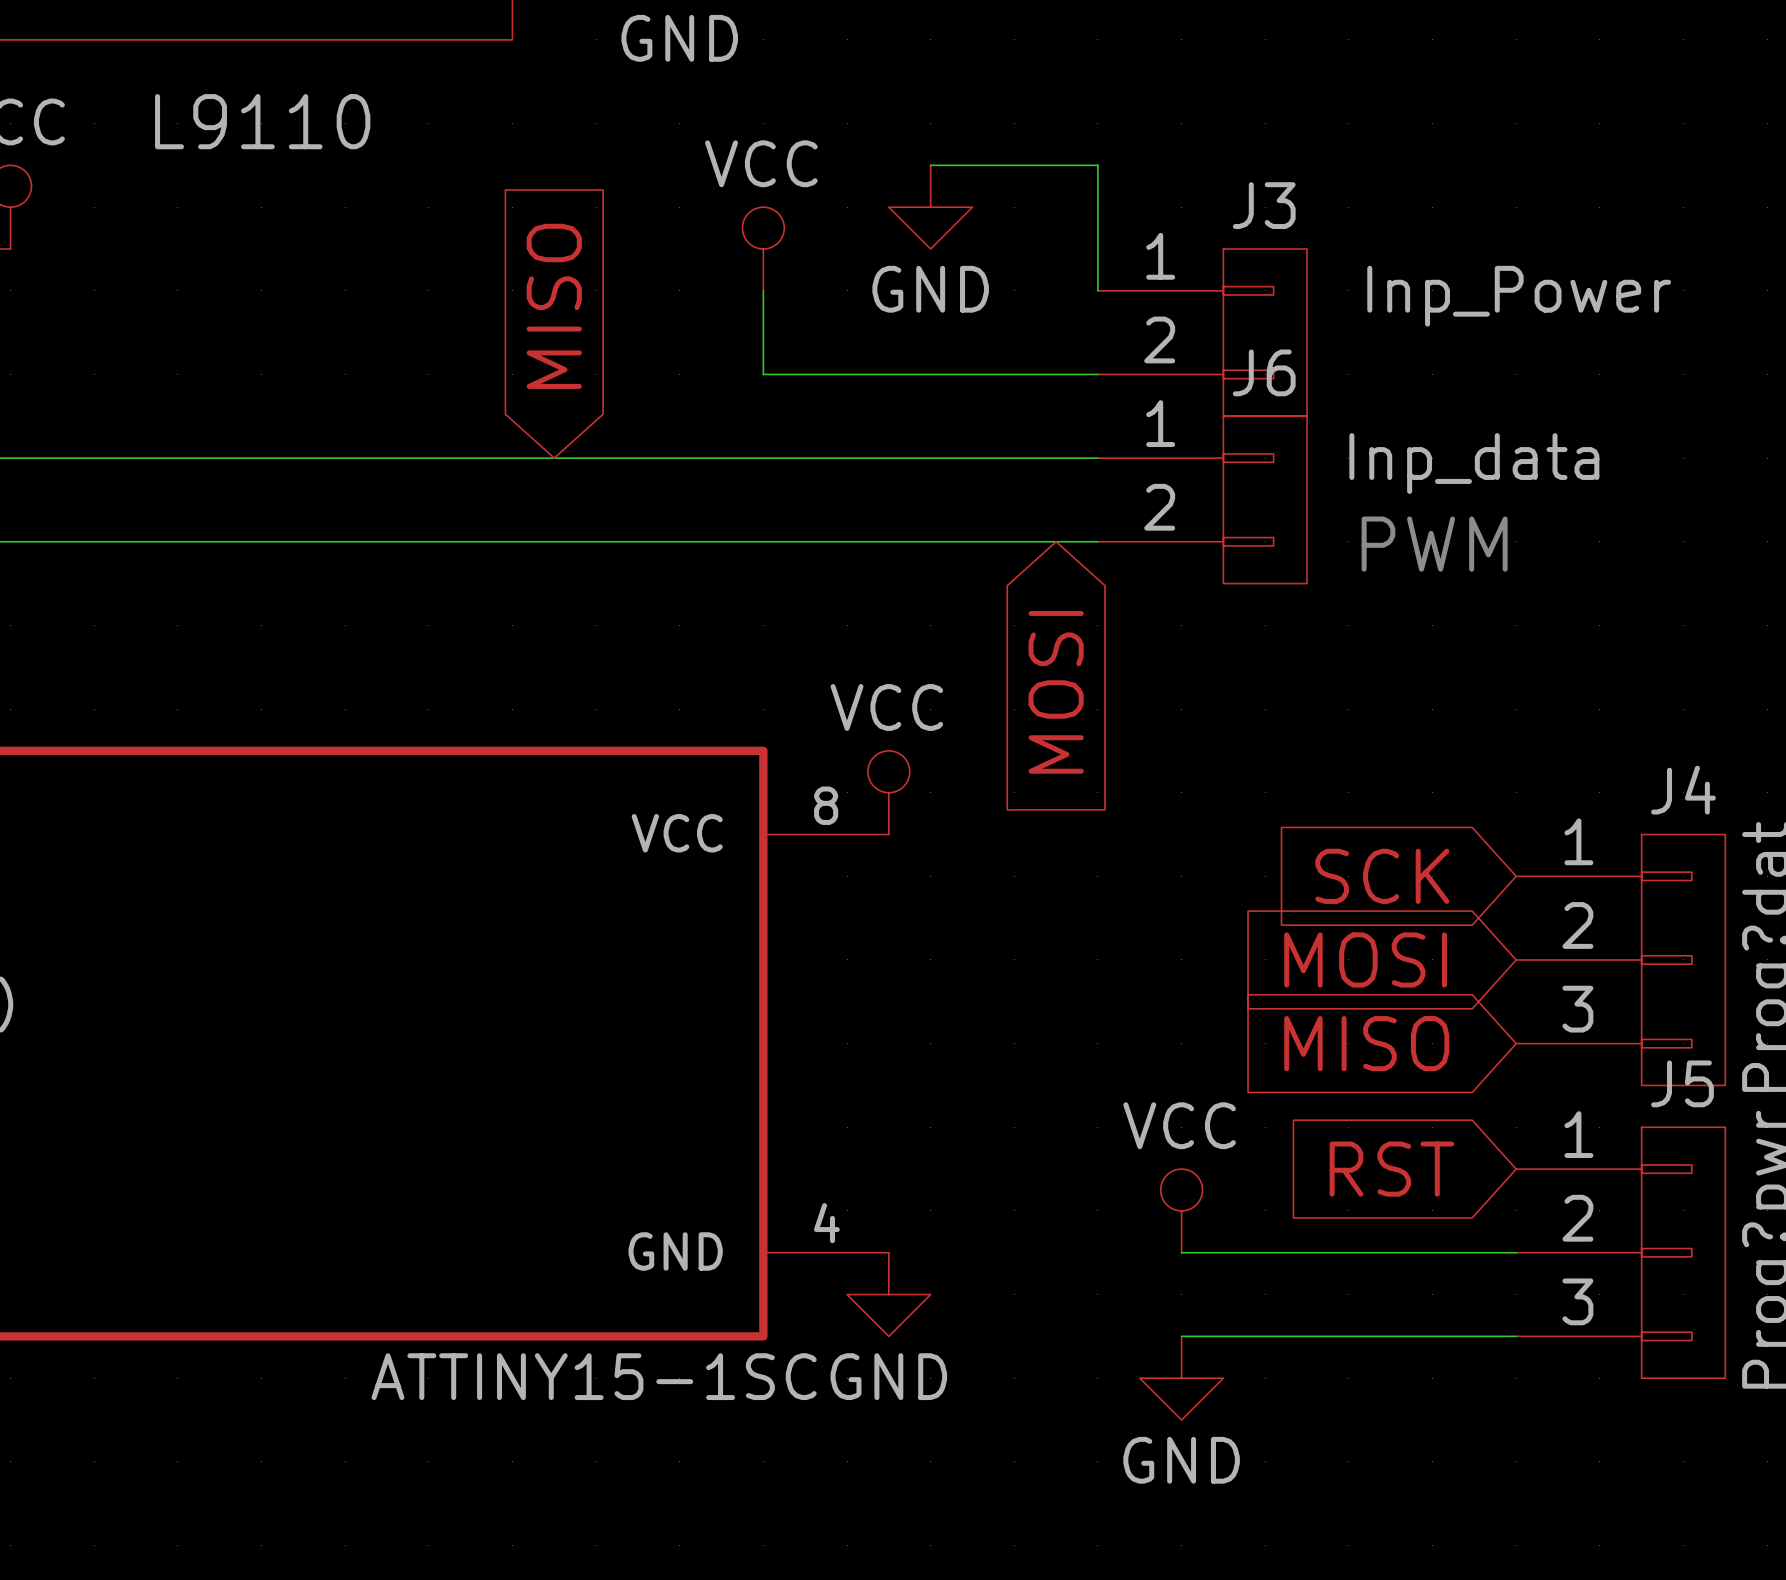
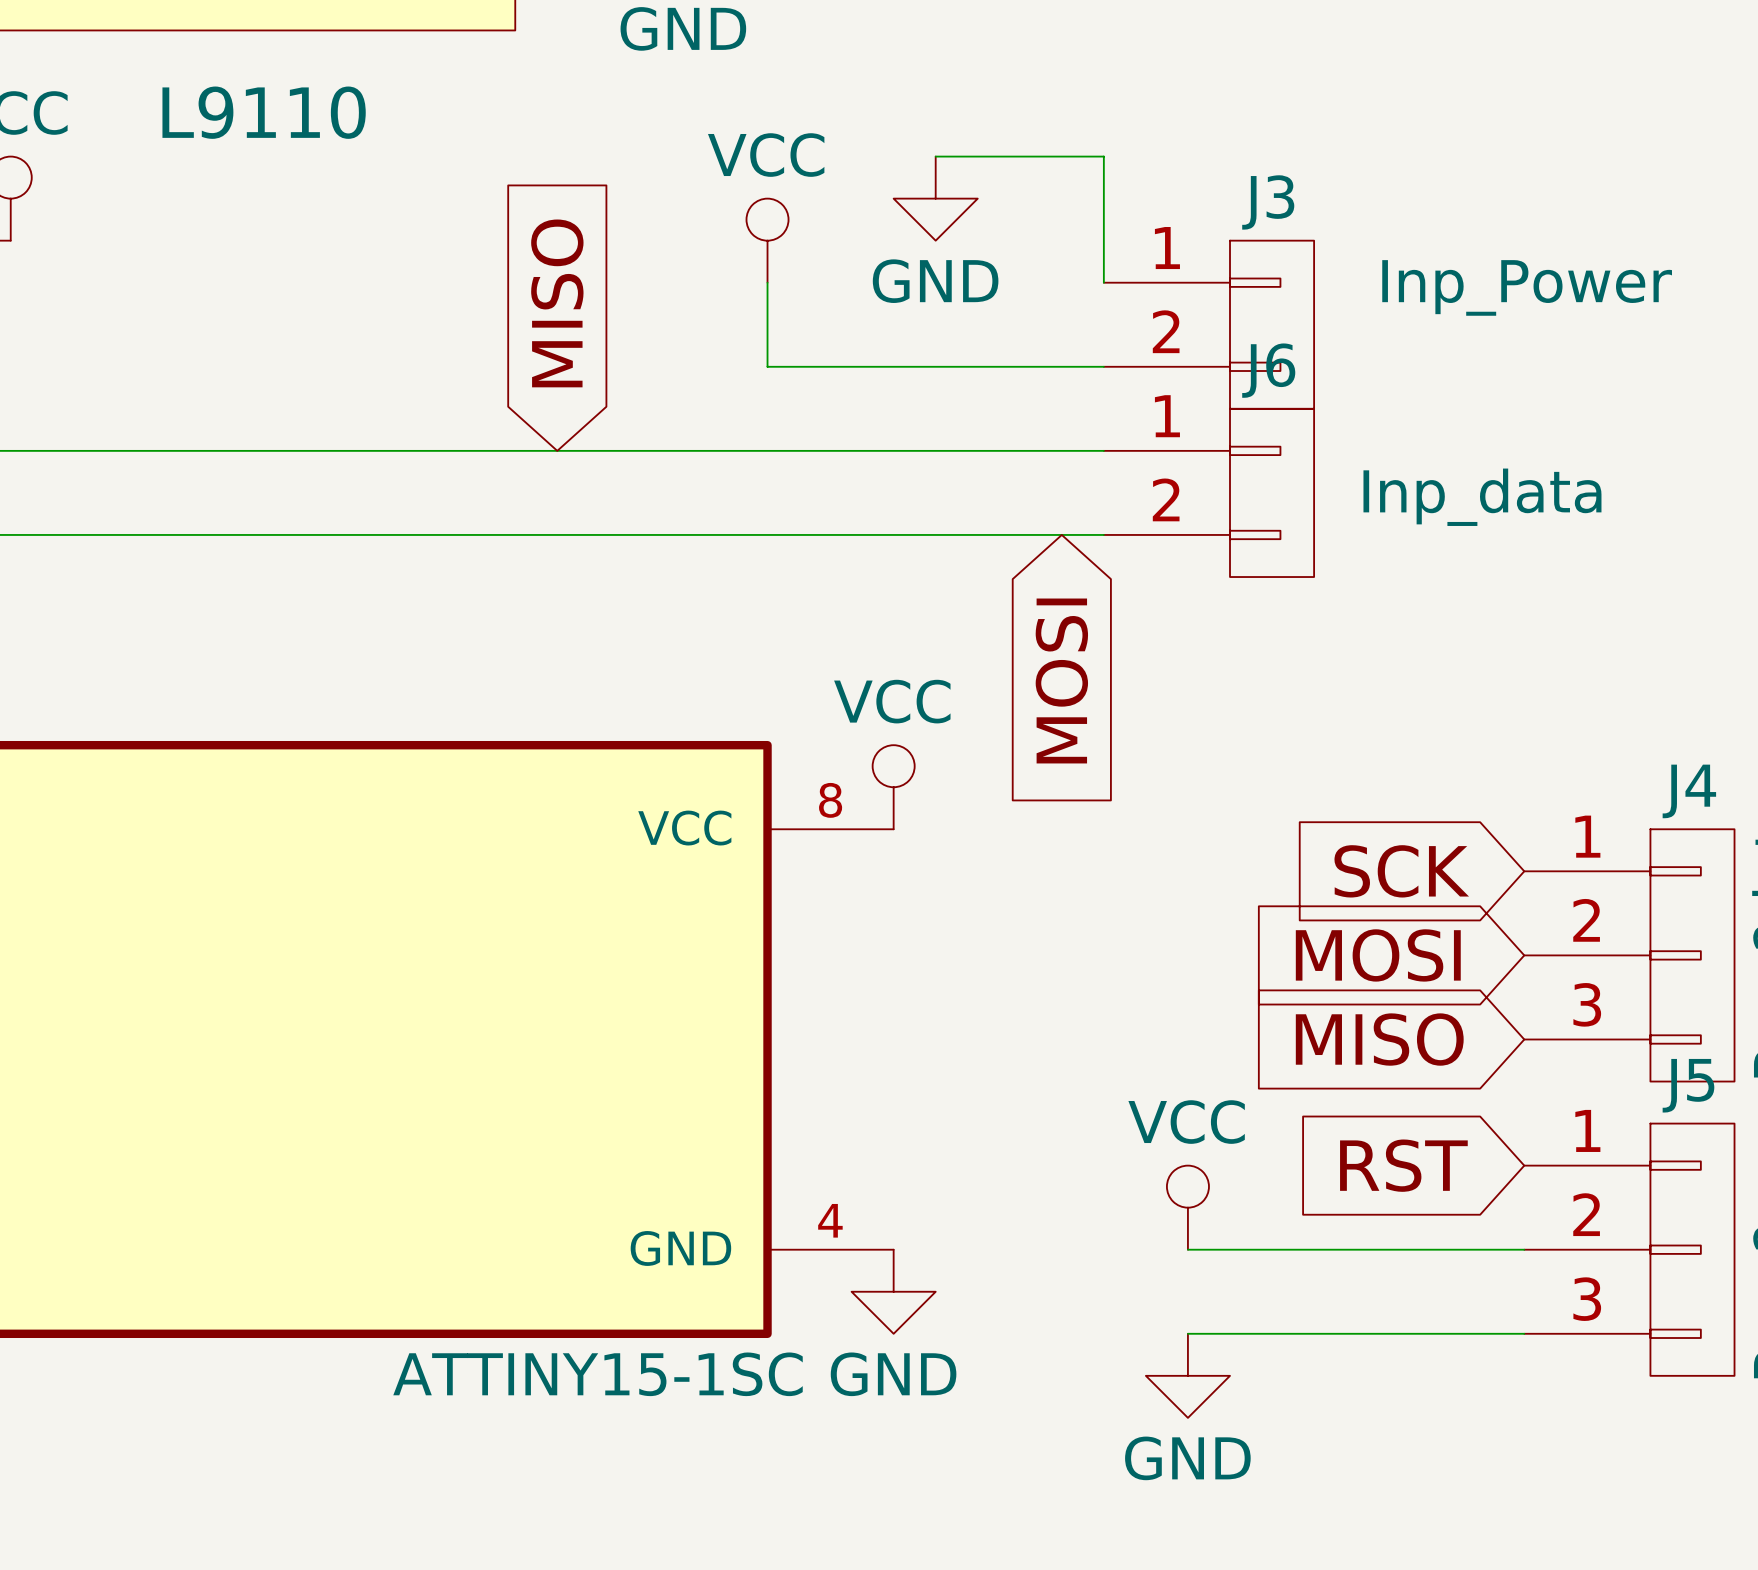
J6 value position: Inp_data (1474, 463) -> Inp_data (1482, 497)
text: PWM (1434, 544) -> none

